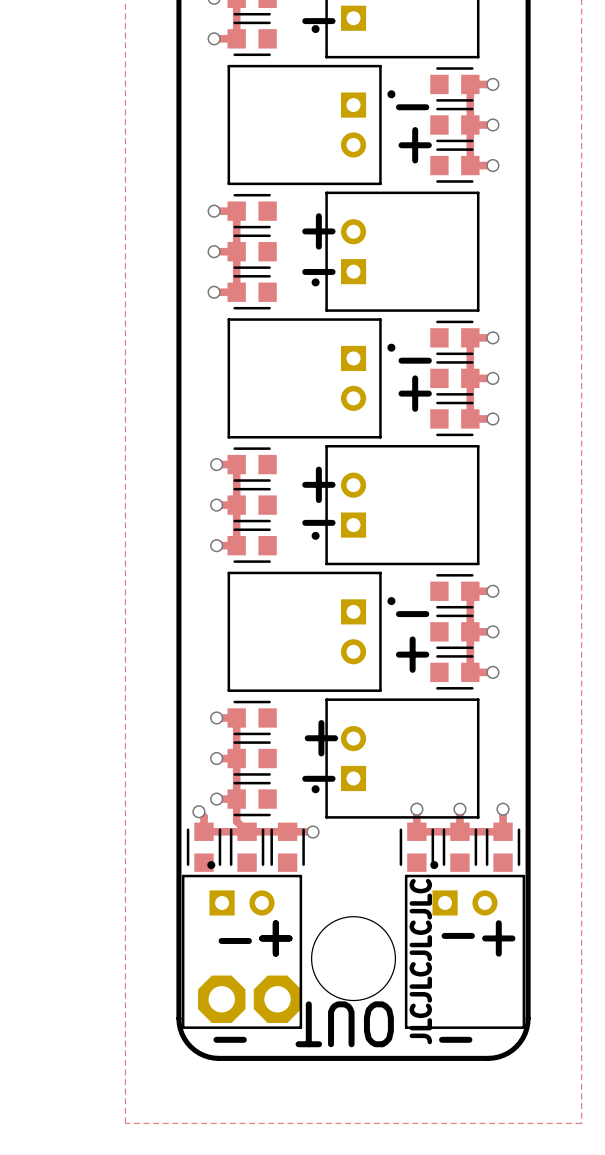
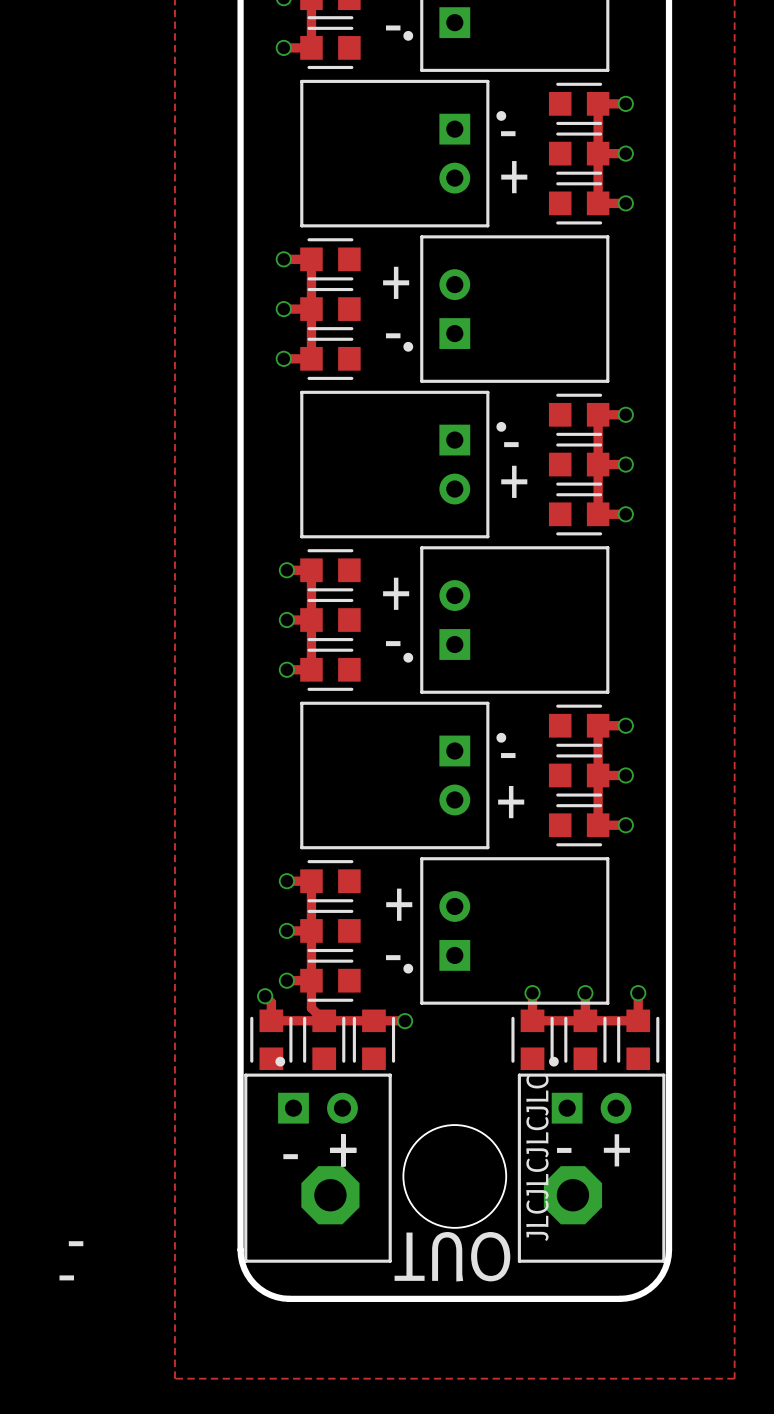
part: none -> (330, 1195)
part: none -> (572, 1195)
part: (221, 999) -> none
part: (277, 999) -> none
text: none -> - (76, 1243)
text: none -> - (66, 1277)
text: - (230, 1039) -> none
text: - (455, 1039) -> none

